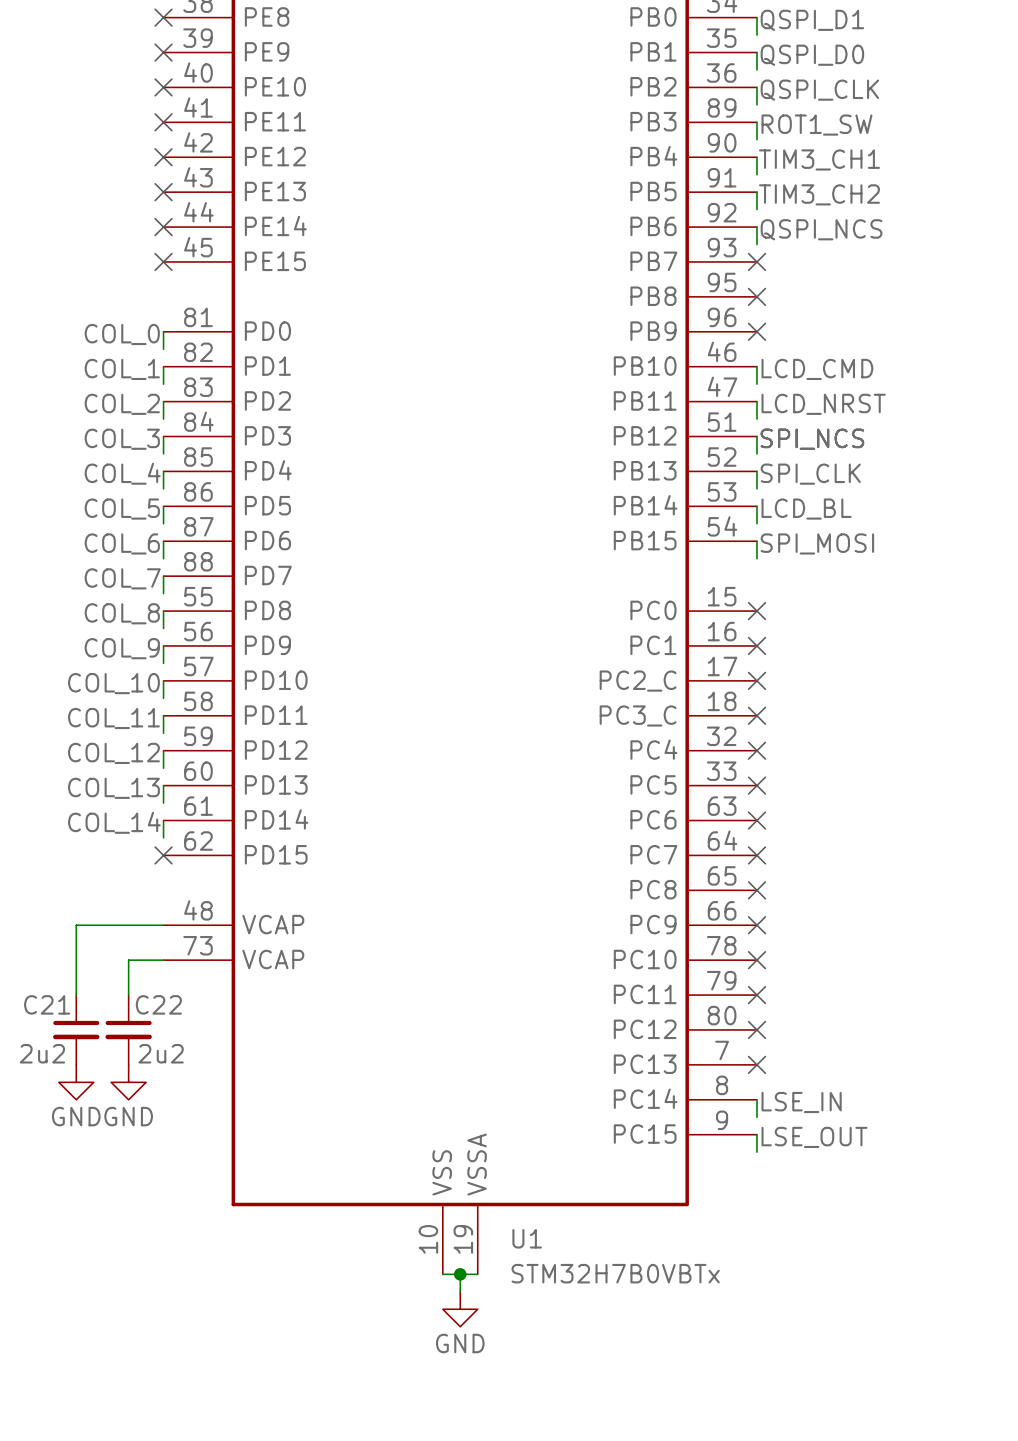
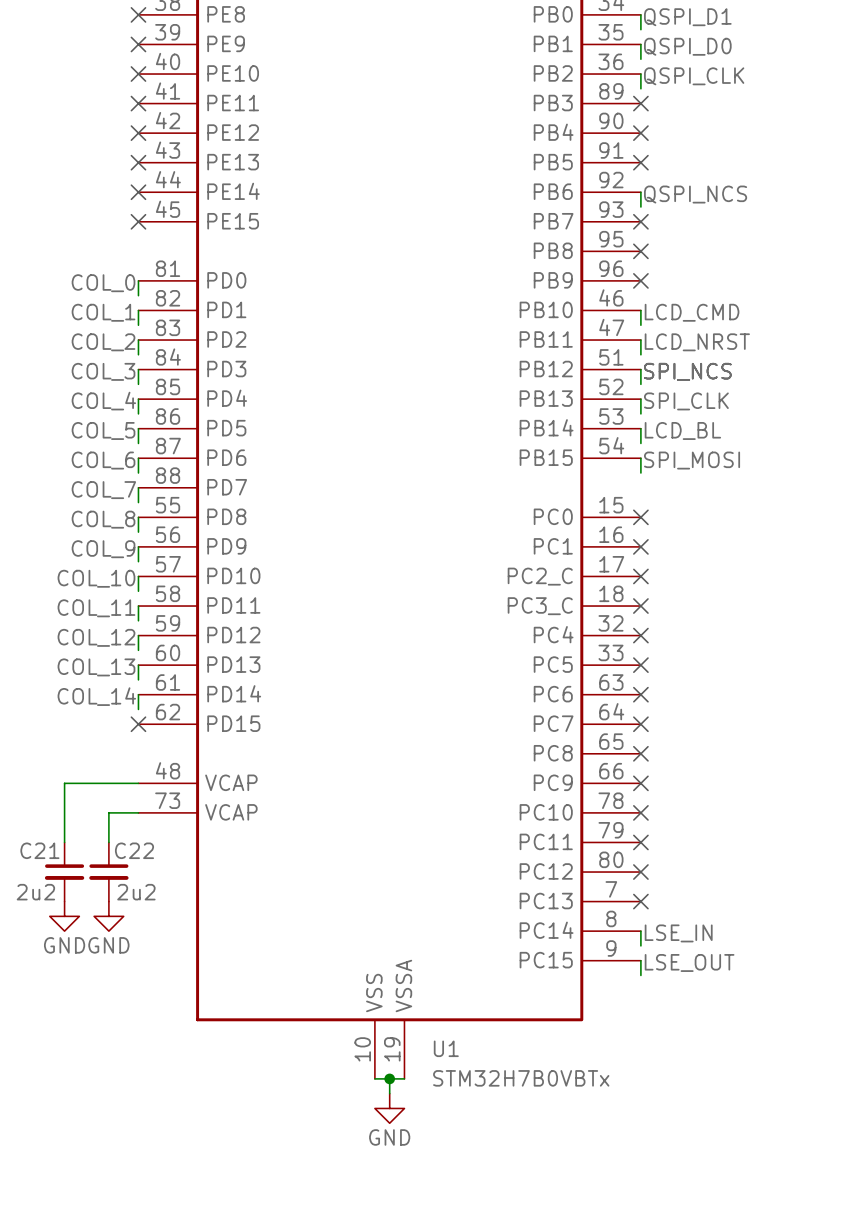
wire: (757, 122) (757, 139) -> none
no-connect mark: none -> (640, 103)
label: ROT1_SW (816, 125) -> none
wire: (757, 157) (757, 174) -> none
no-connect mark: none -> (640, 133)
label: TIM3_CH1 (819, 159) -> none
wire: (757, 192) (757, 209) -> none
no-connect mark: none -> (640, 162)
label: TIM3_CH2 (819, 194) -> none

